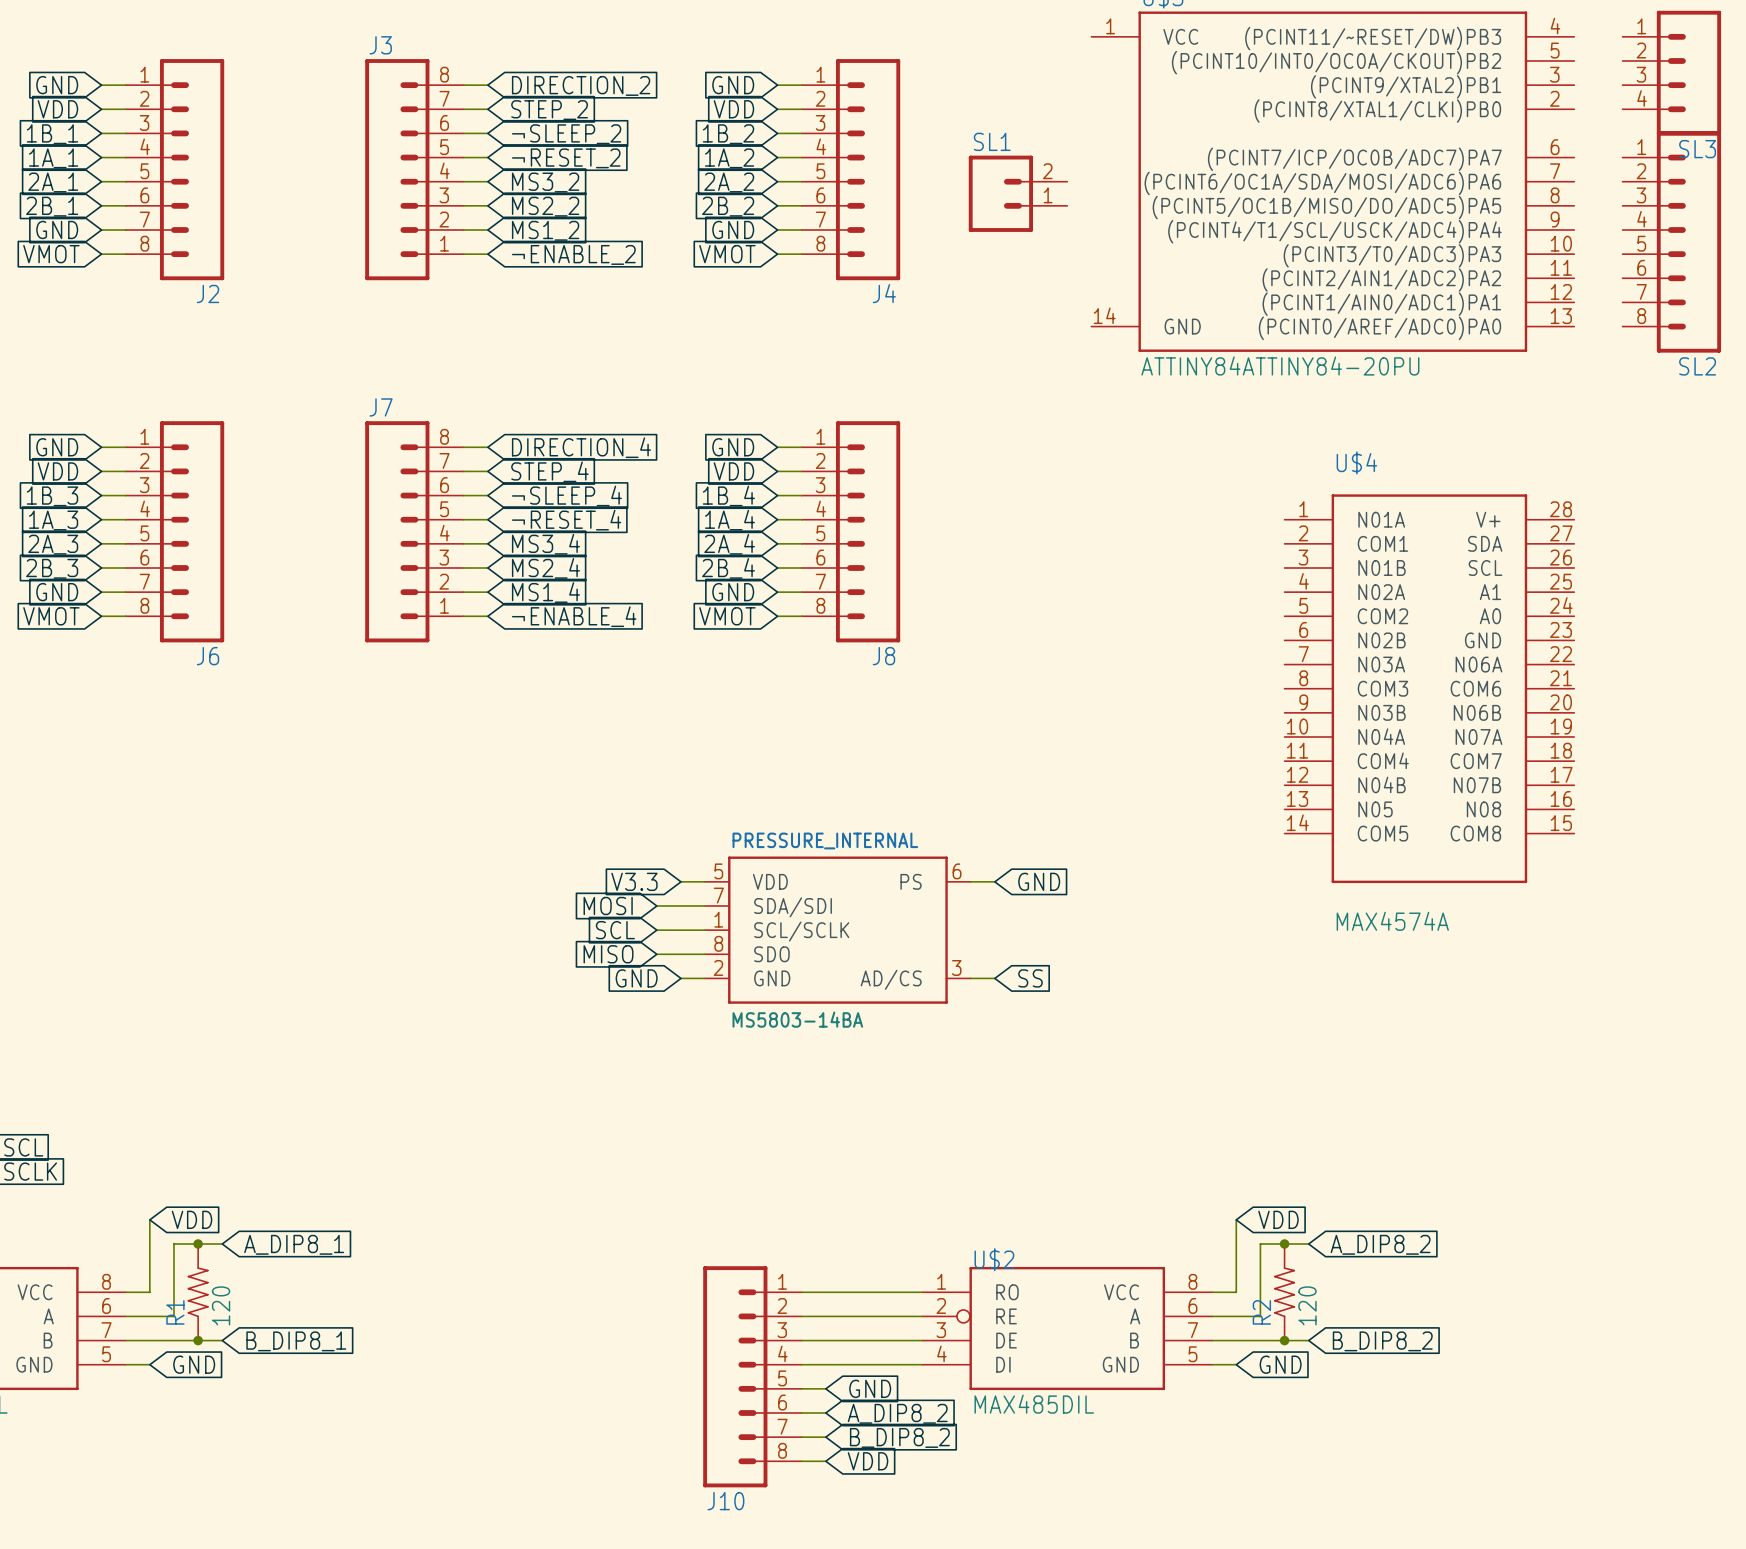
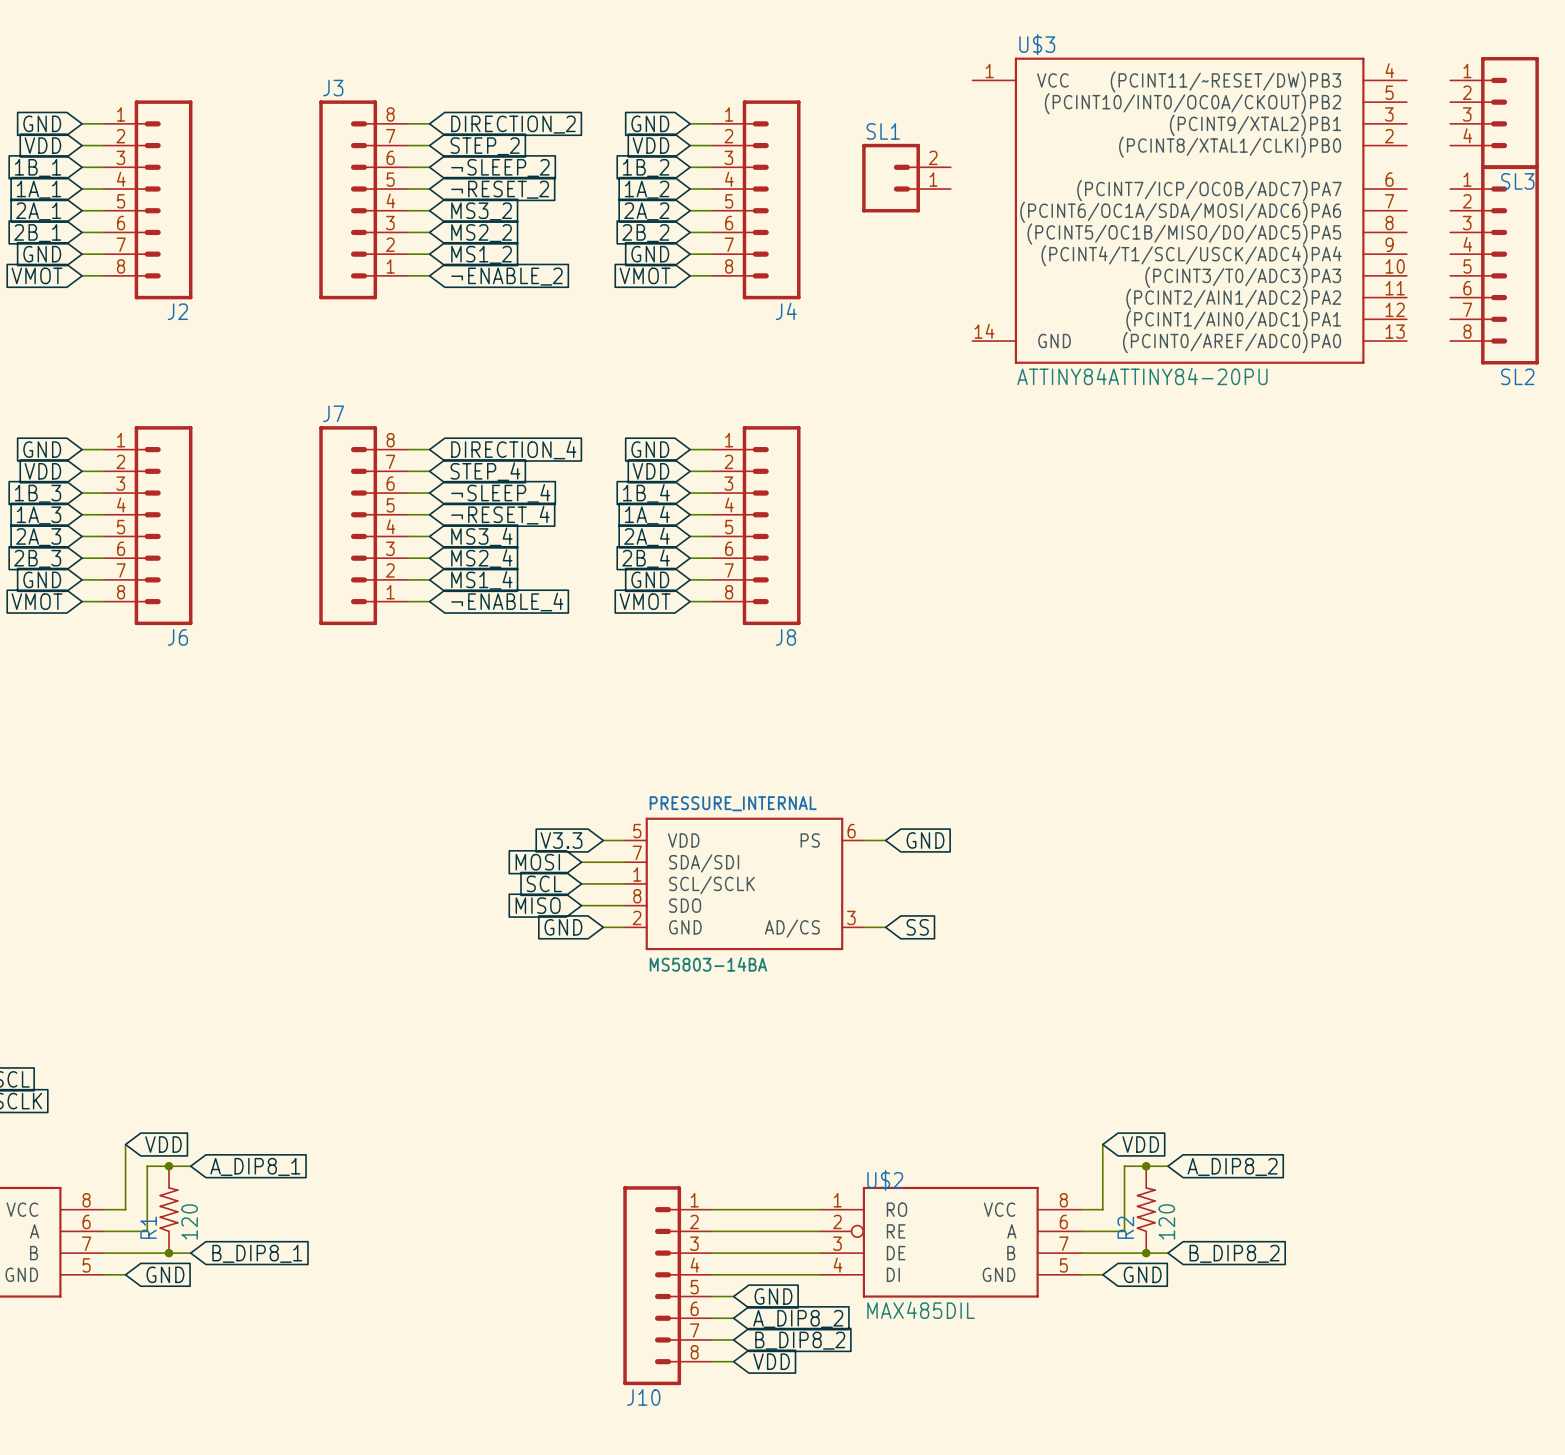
SL1 position: (1018, 193) -> (906, 178)
U$4: MAX4574A (1429, 688) -> none

